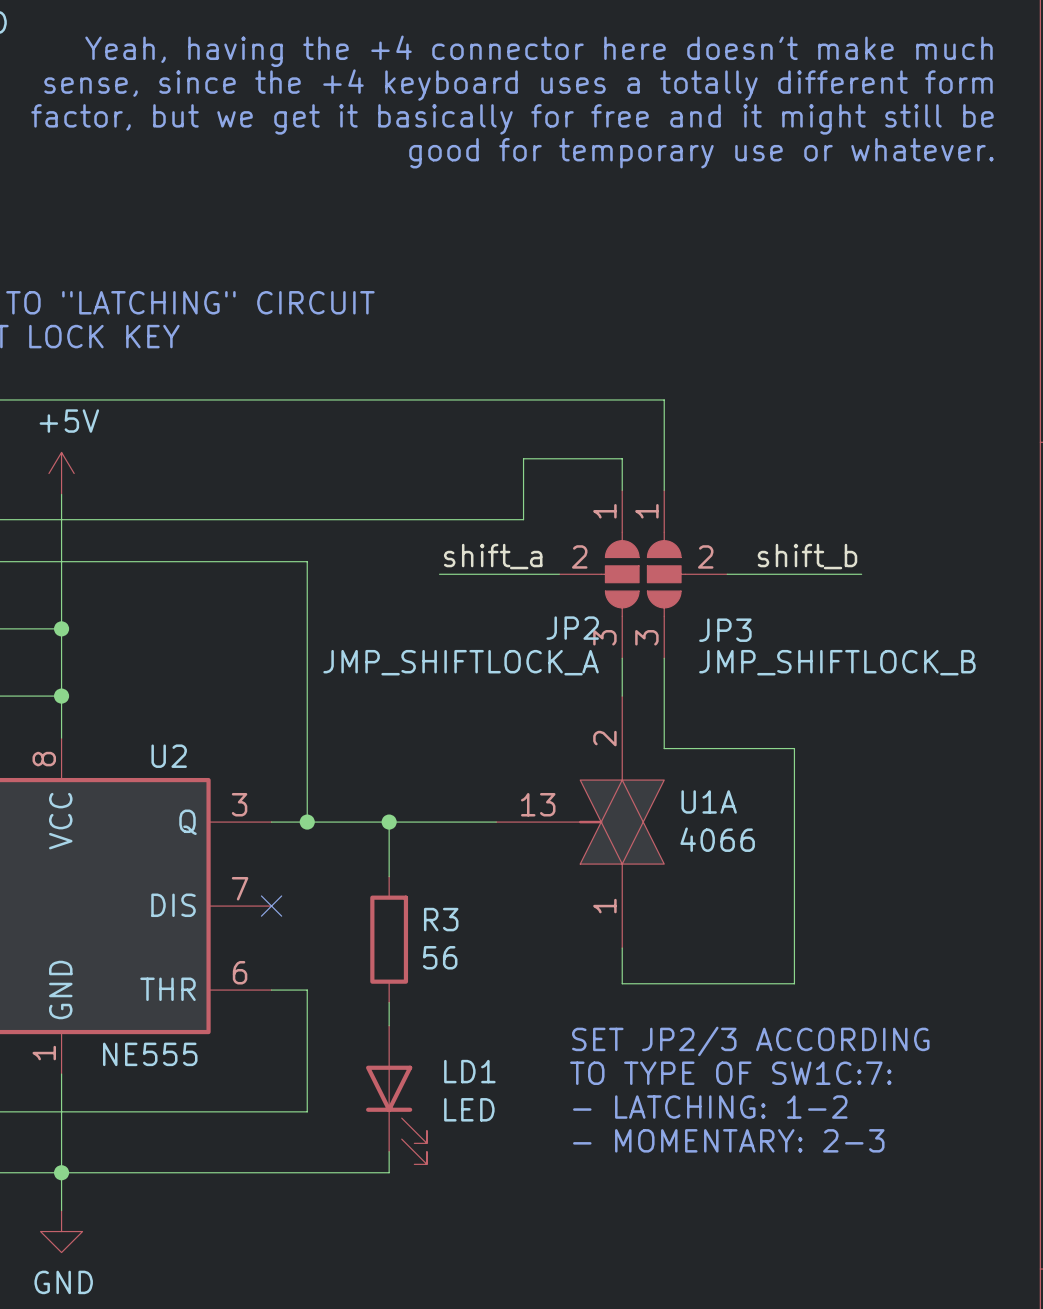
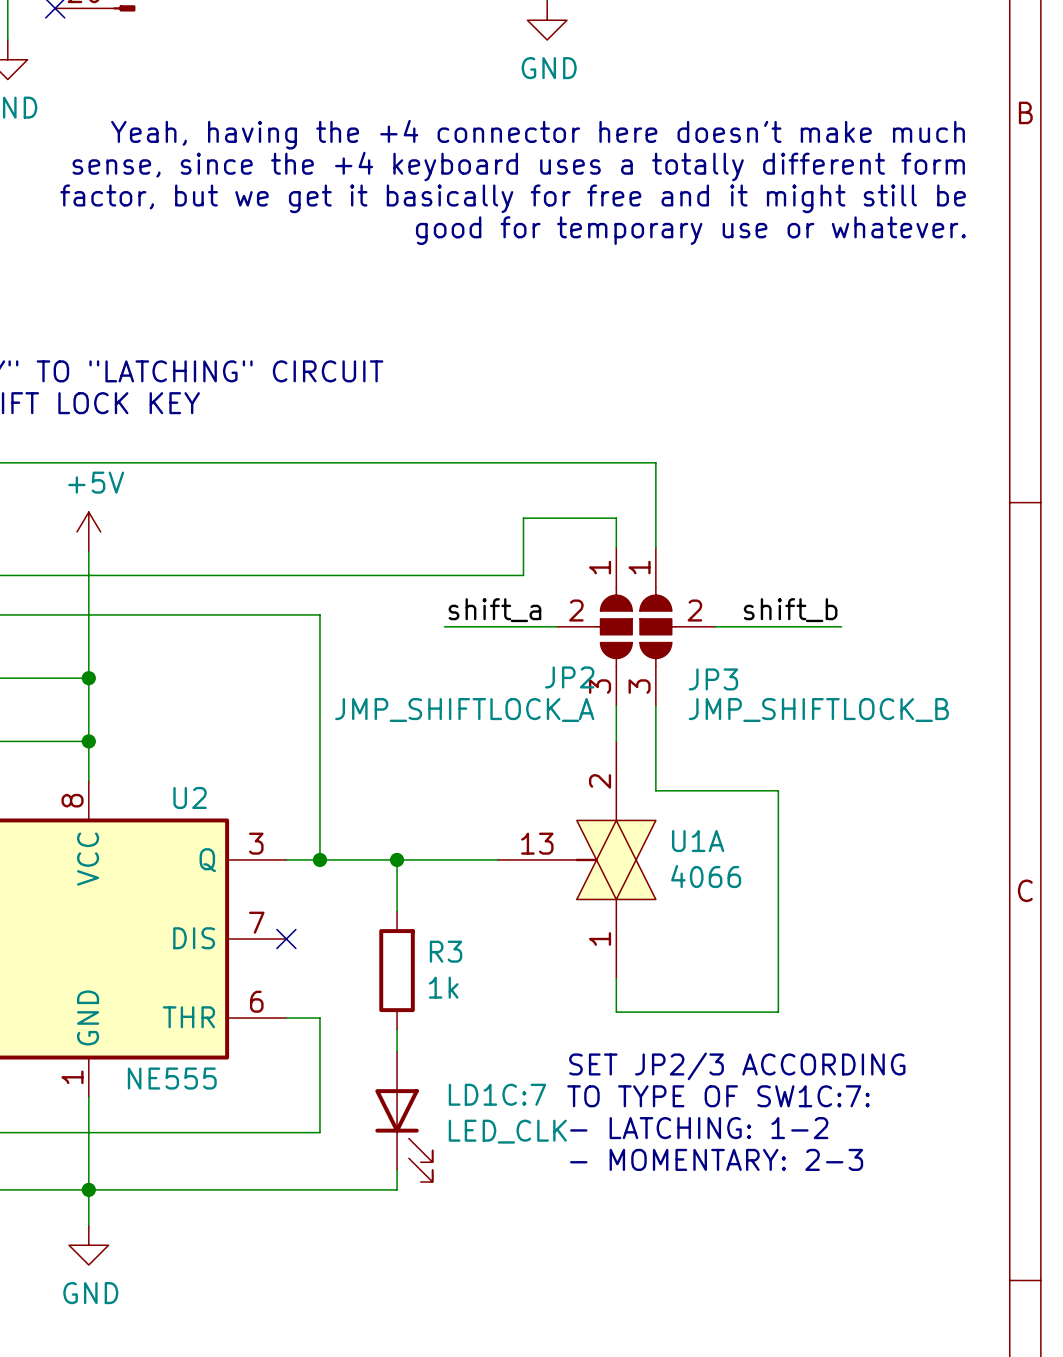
R3 value: 56 (440, 957) -> 1k (443, 987)
LD1 name: LD1 (469, 1071) -> LD1C:7 (497, 1094)
LD1 value: LED (469, 1109) -> LED_CLK (507, 1131)

